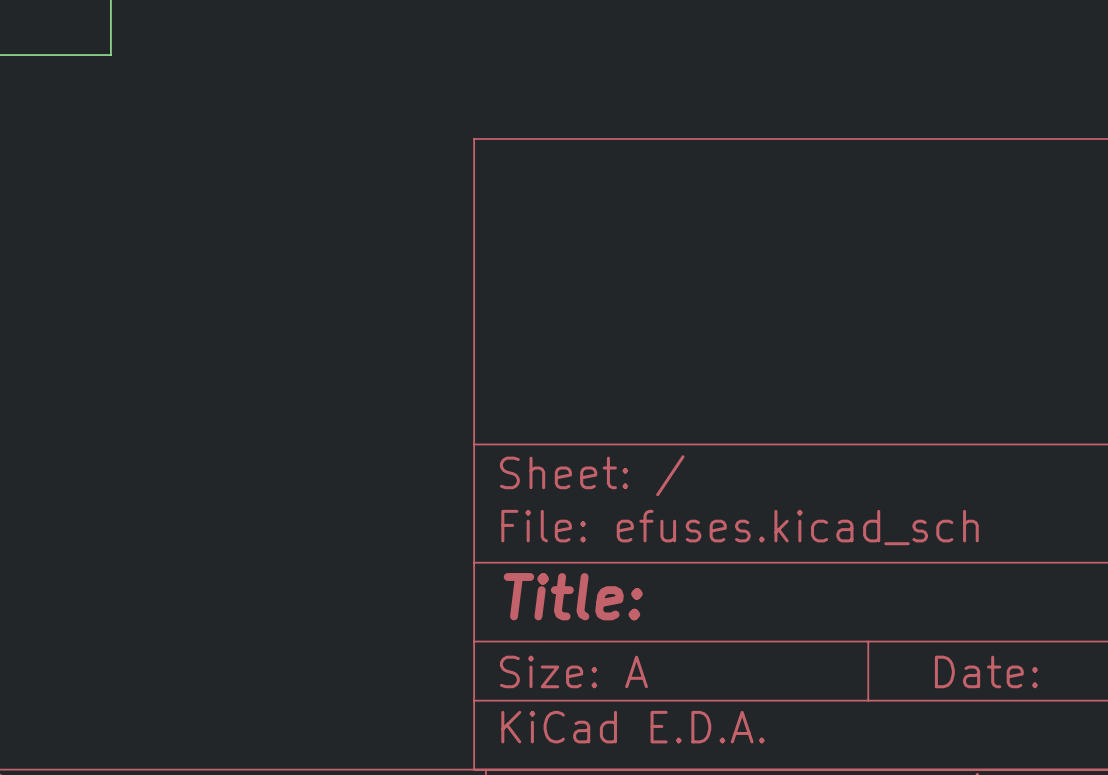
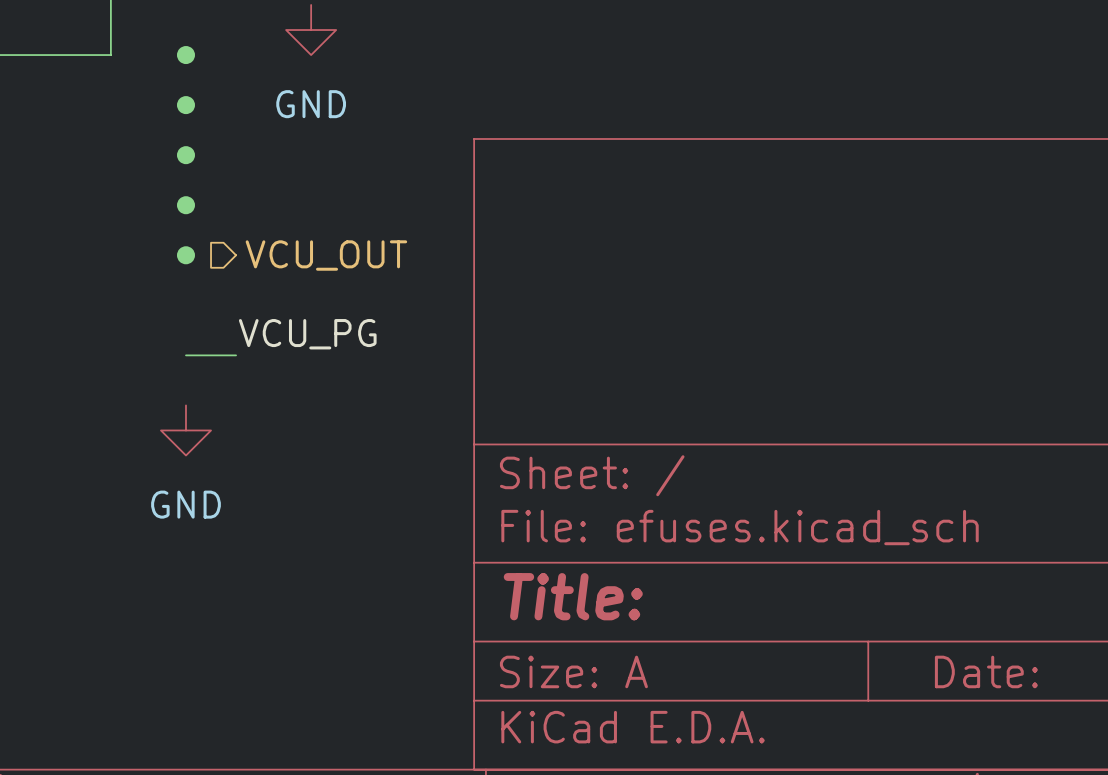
power symbol: none -> GND (311, 30)
junction: none -> (185, 55)
junction: none -> (185, 105)
junction: none -> (185, 155)
junction: none -> (185, 205)
junction: none -> (185, 255)
hierarchical label: none -> VCU_OUT (326, 255)
label: none -> VCU_PG (307, 334)
wire: none -> (185, 355) (236, 355)
power symbol: none -> GND (185, 430)

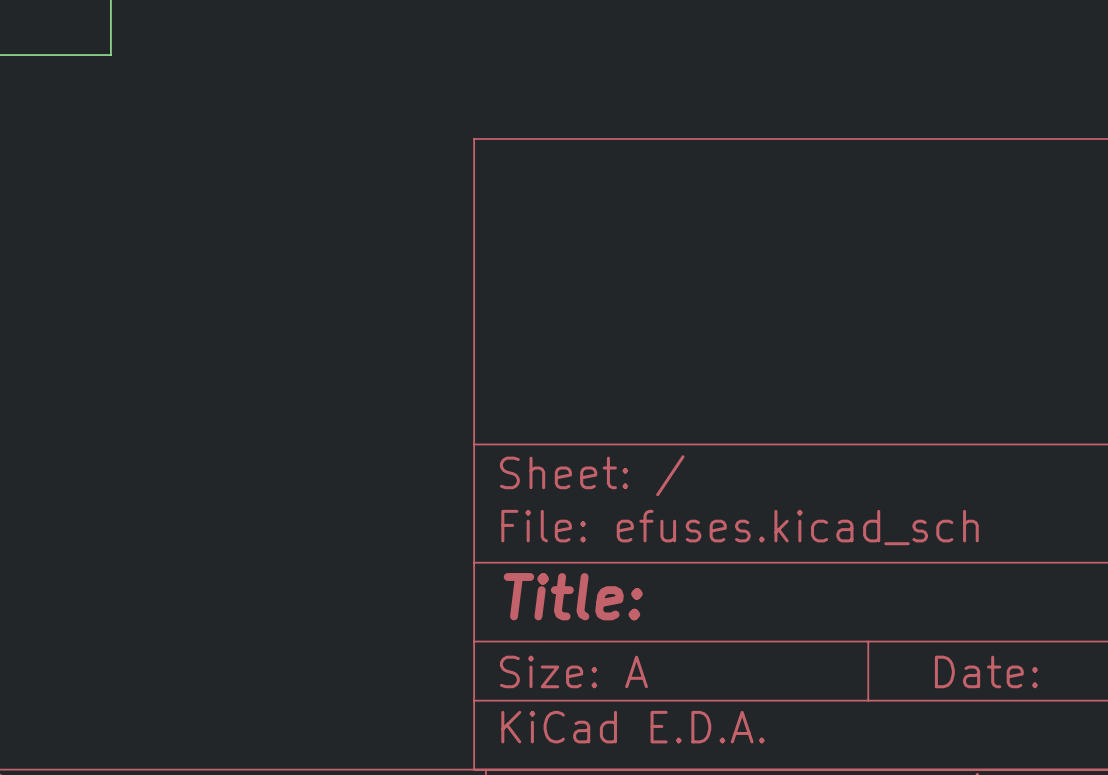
power symbol: GND (311, 30) -> none
junction: (185, 55) -> none
junction: (185, 105) -> none
junction: (185, 155) -> none
junction: (185, 205) -> none
junction: (185, 255) -> none
hierarchical label: VCU_OUT (326, 255) -> none
label: VCU_PG (307, 334) -> none
wire: (185, 355) (236, 355) -> none
power symbol: GND (185, 430) -> none

